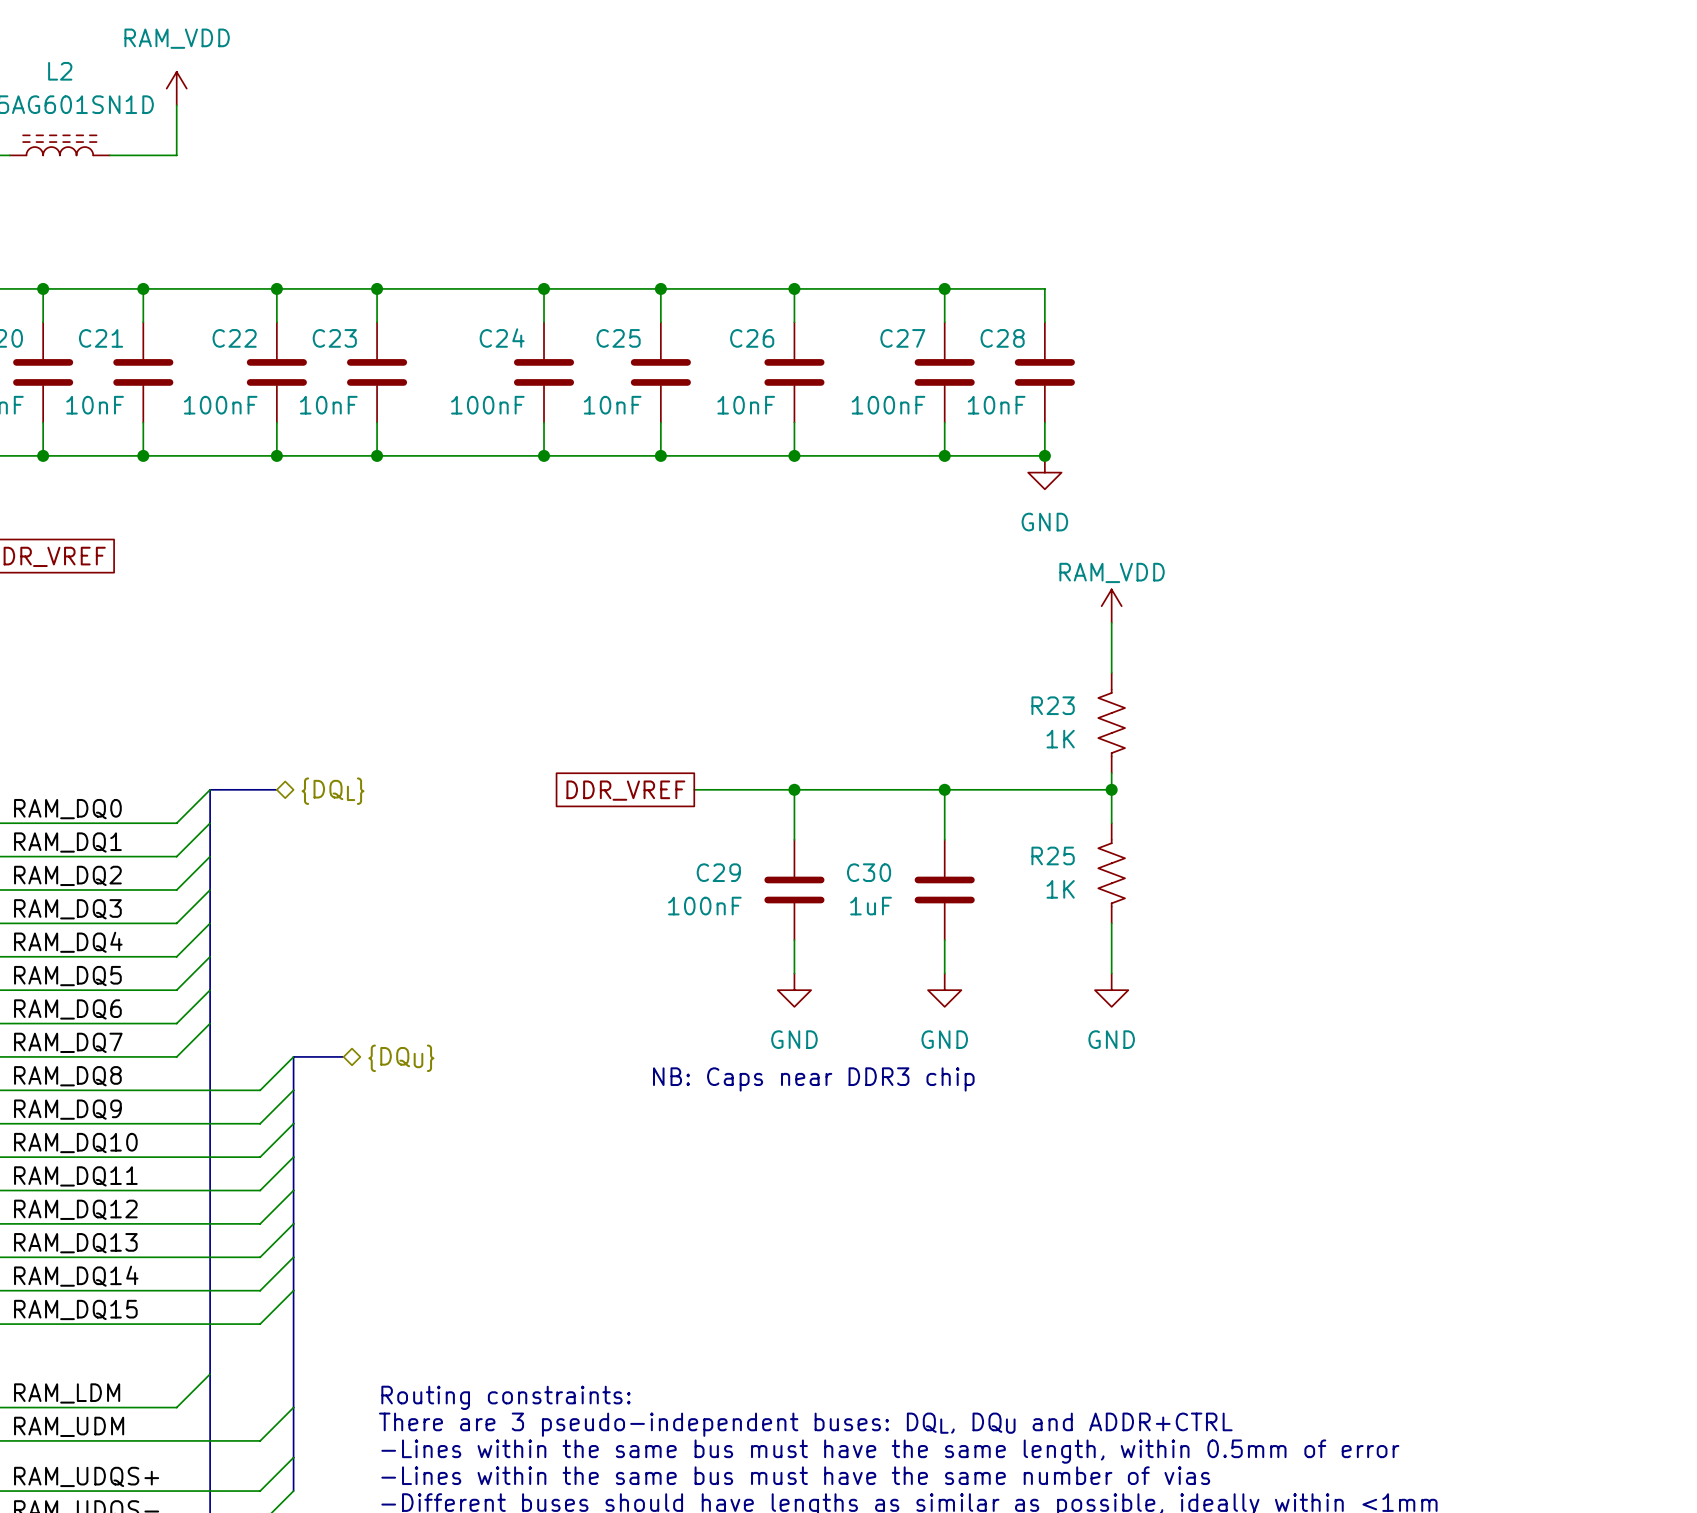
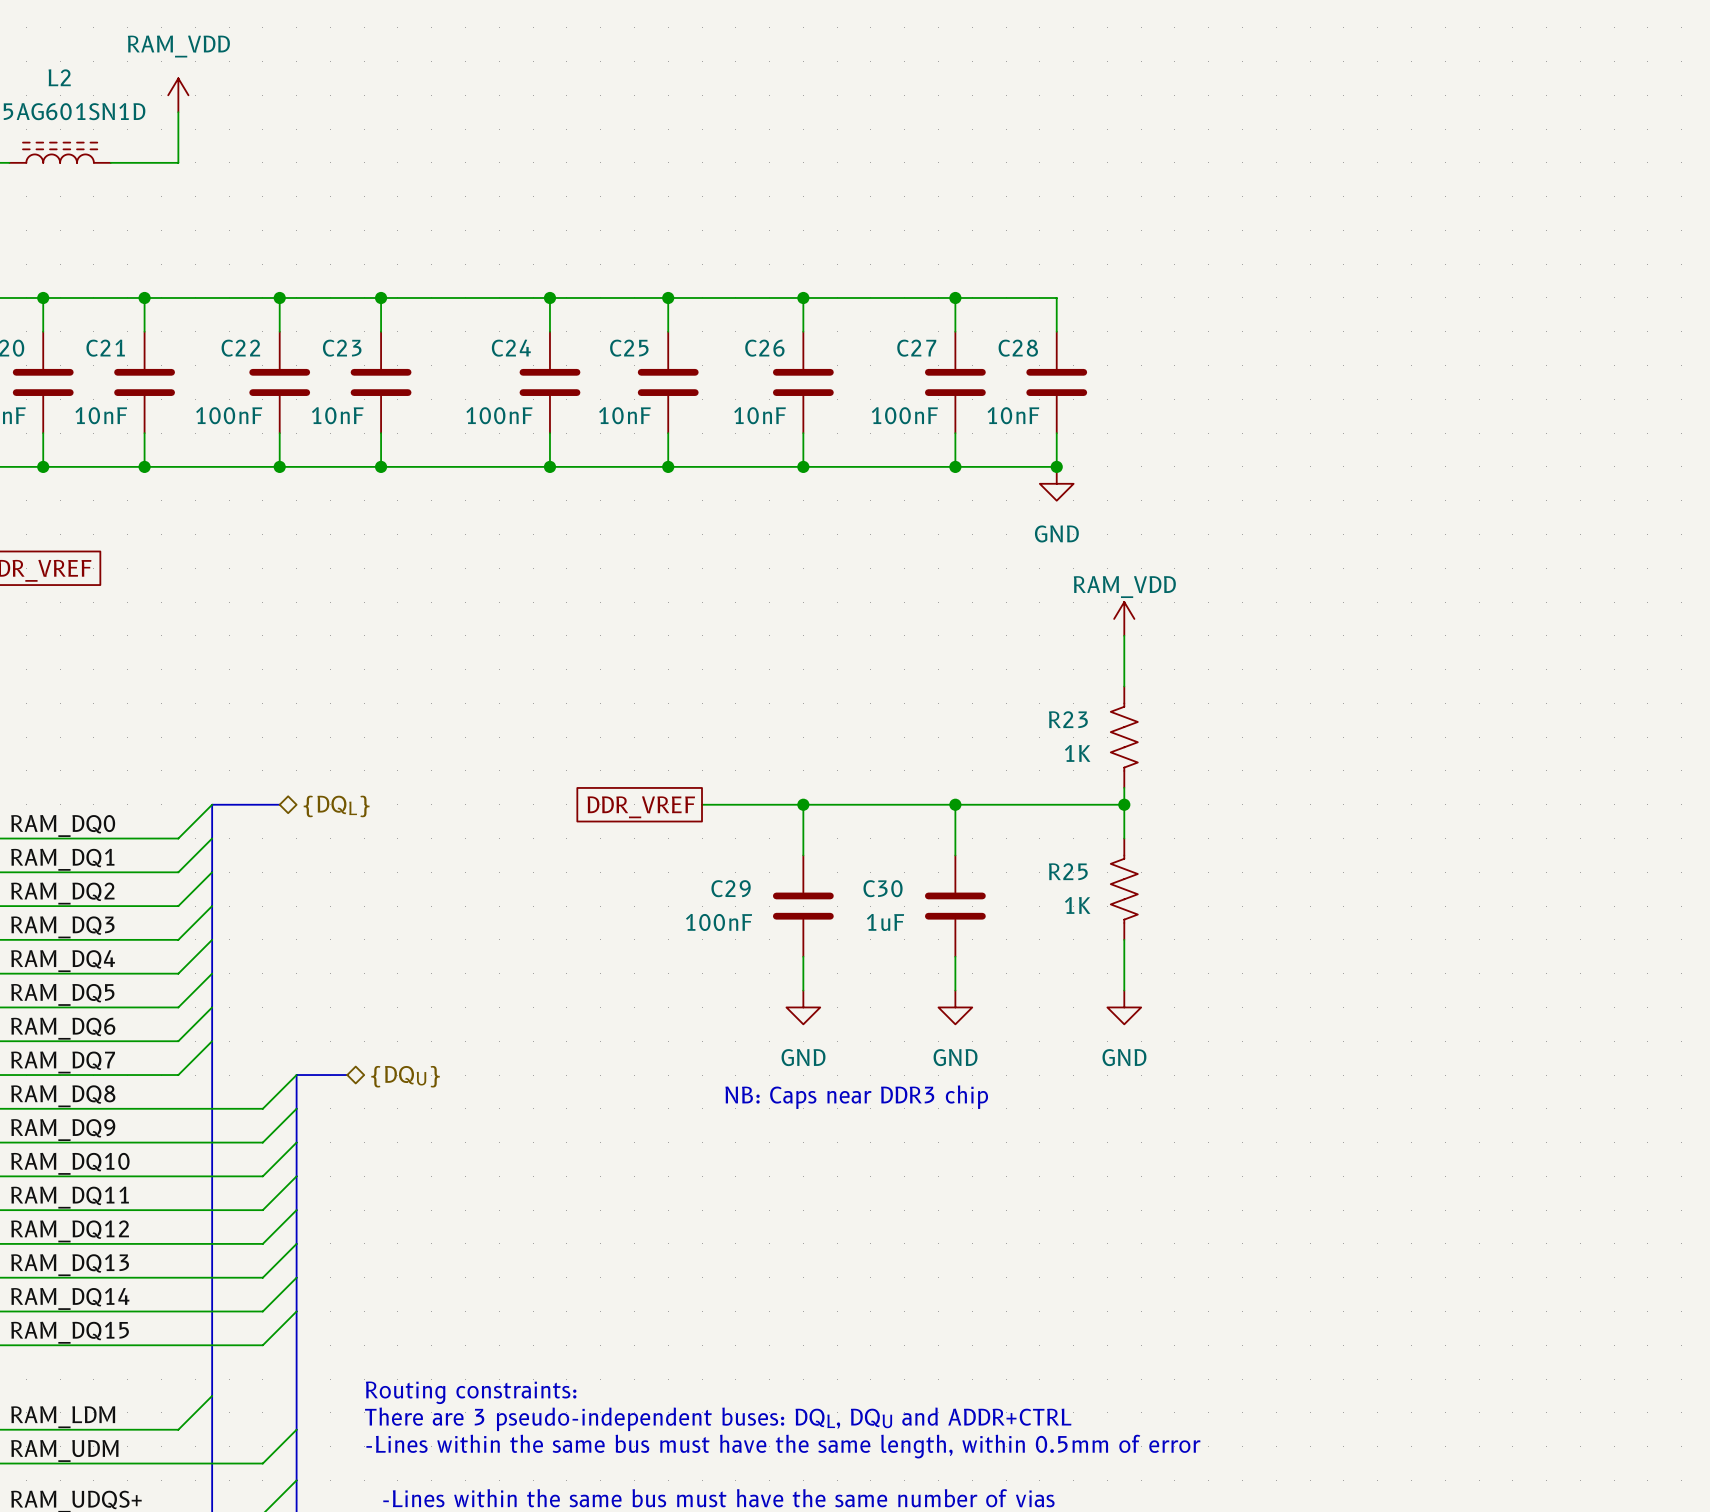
text position: Routing constraints: (505, 1397) -> Routing constraints: (471, 1392)
text position: There are 3 pseudo-independent buses: DQL, DQU and ADDR+CTRL (805, 1424) -> There are 3 pseudo-independent buses: DQL, DQU and ADDR+CTRL (718, 1419)
text position: -Lines within the same bus must have the same length, within 0.5mm of error (890, 1451) -> -Lines within the same bus must have the same length, within 0.5mm of error (783, 1446)

